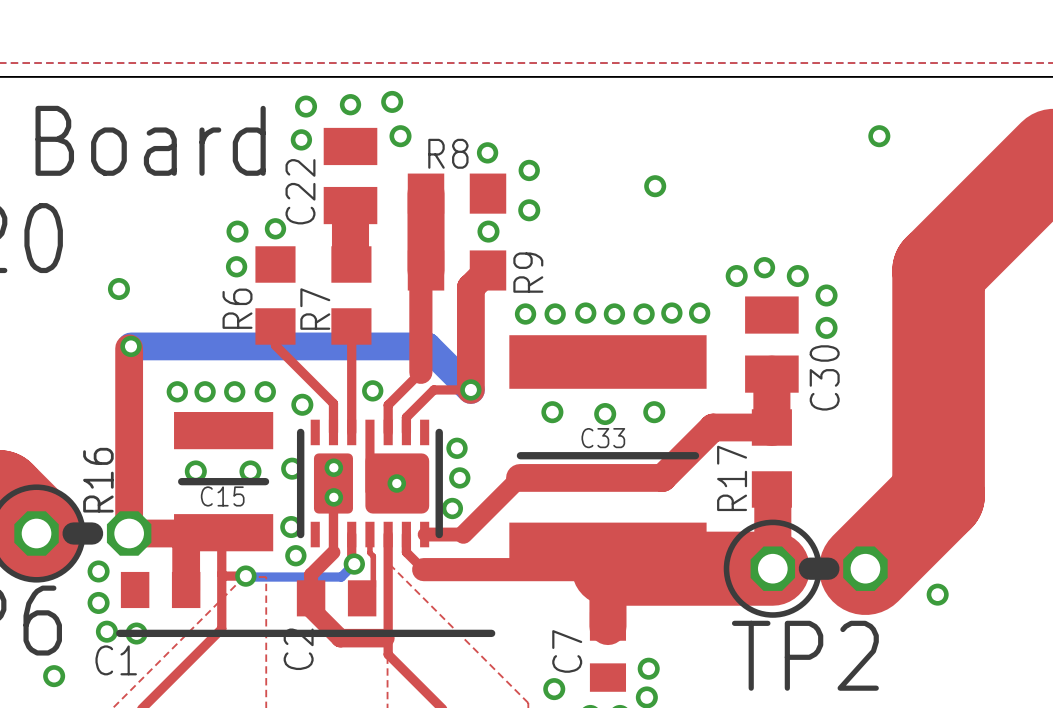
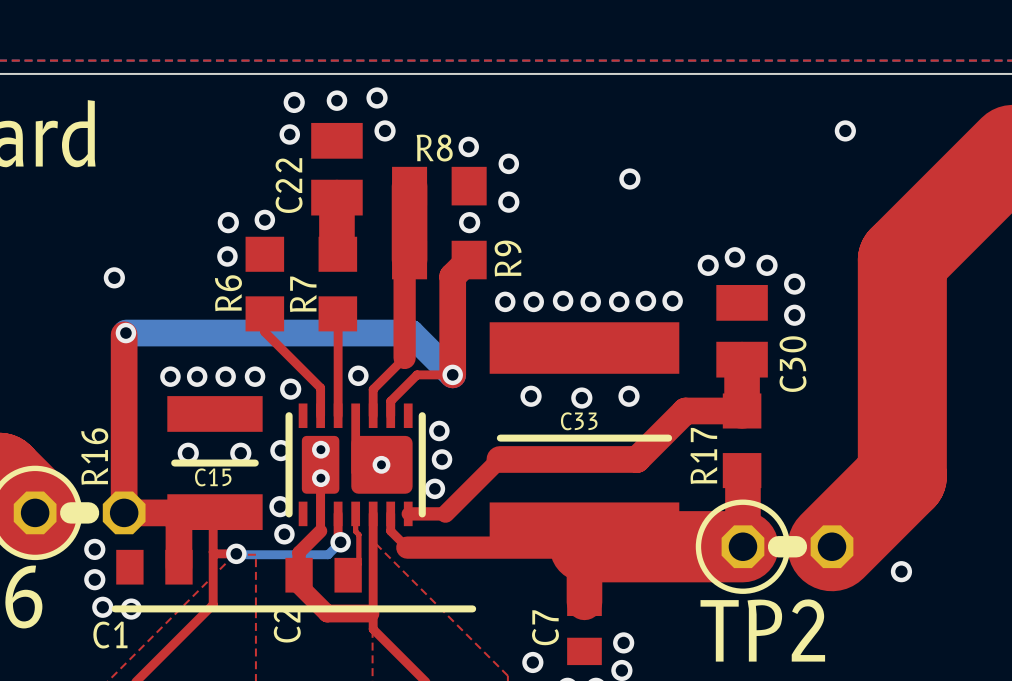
via: (54, 676) -> none

